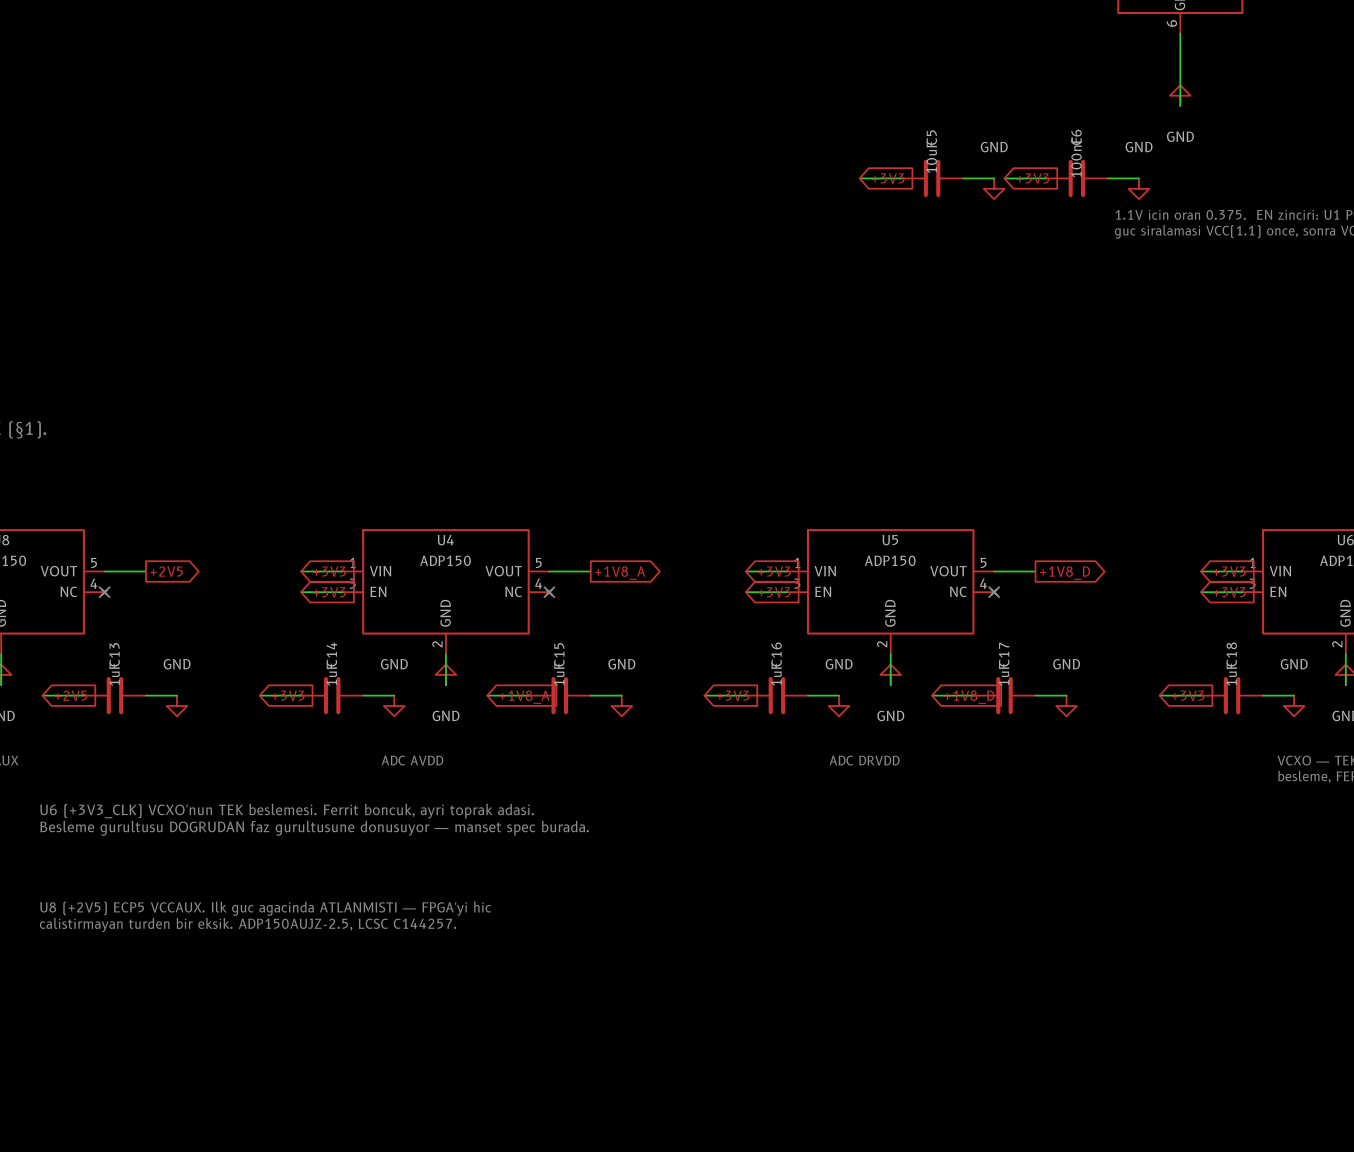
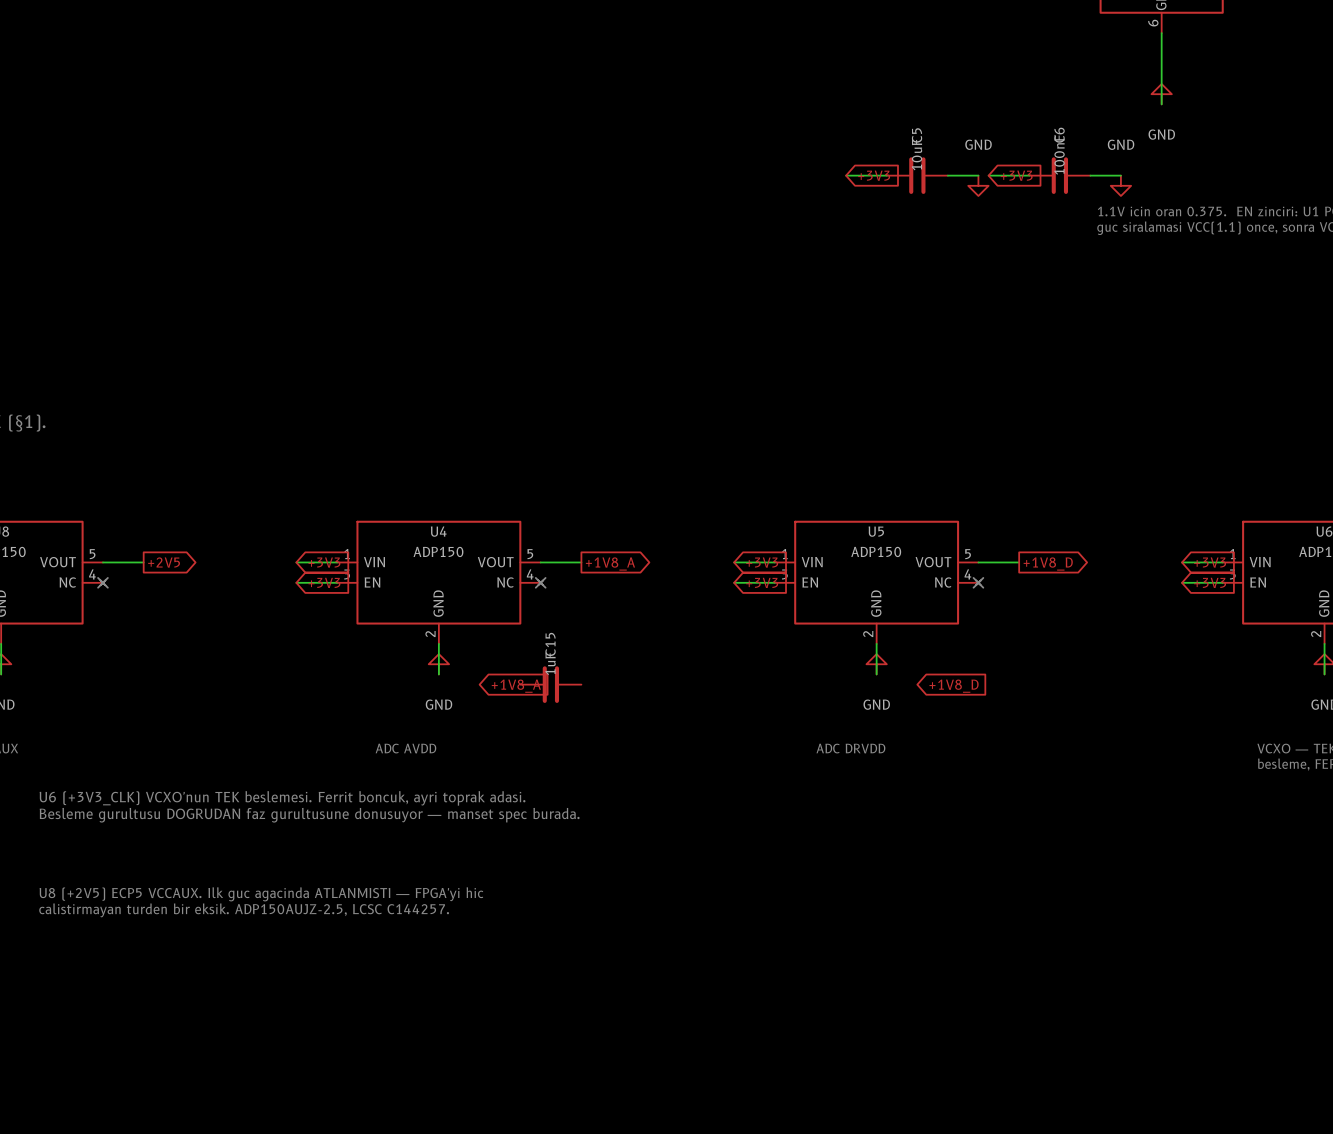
wire: (42, 695) (83, 695) -> none
global label: +2V5 (71, 695) -> none
C13: 1uF (114, 695) -> none
wire: (145, 695) (177, 695) -> none
wire: (259, 695) (301, 695) -> none
global label: +3V3 (288, 695) -> none
C14: 1uF (332, 695) -> none
wire: (363, 695) (394, 695) -> none
wire: (487, 695) (528, 695) -> none
wire: (590, 695) (621, 695) -> none
wire: (704, 695) (745, 695) -> none
global label: +3V3 (733, 695) -> none
C16: 1uF (776, 695) -> none
wire: (807, 695) (838, 695) -> none
wire: (932, 695) (973, 695) -> none
C17: 1uF (1004, 695) -> none
wire: (1035, 695) (1066, 695) -> none
wire: (1159, 695) (1201, 695) -> none
global label: +3V3 (1188, 695) -> none
C18: 1uF (1232, 695) -> none
wire: (1263, 695) (1294, 695) -> none
power symbol: GND (177, 705) -> none
power symbol: GND (394, 705) -> none
power symbol: GND (621, 705) -> none
power symbol: GND (838, 705) -> none
power symbol: GND (1066, 705) -> none
power symbol: GND (1294, 705) -> none

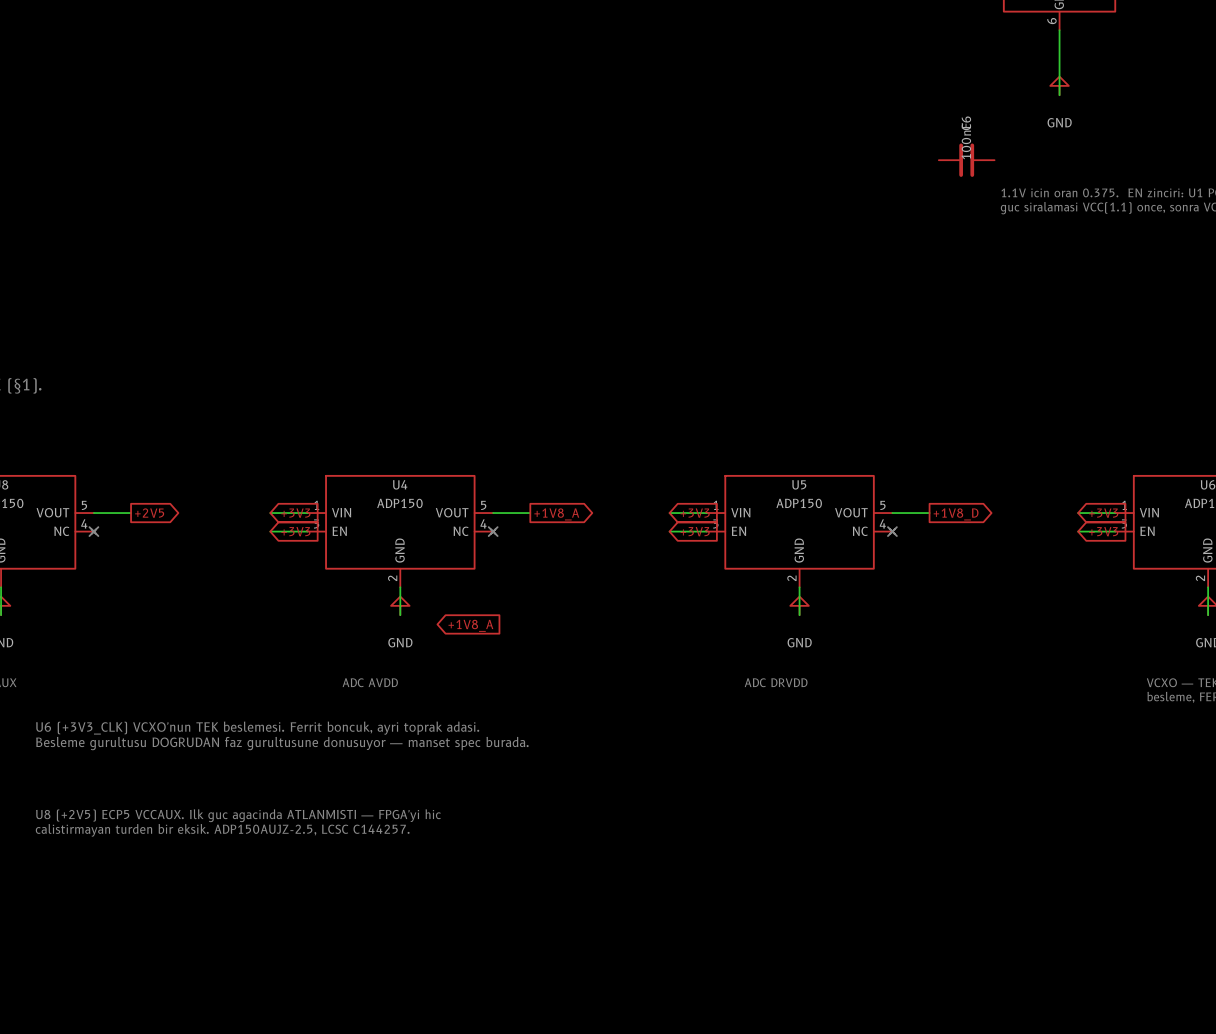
wire: (846, 175) (886, 175) -> none
global label: +3V3 (874, 175) -> none
C5: 10uF (917, 175) -> none
wire: (947, 175) (978, 175) -> none
wire: (988, 175) (1029, 175) -> none
global label: +3V3 (1016, 175) -> none
wire: (1090, 175) (1120, 175) -> none
power symbol: GND (978, 185) -> none
power symbol: GND (1120, 185) -> none
C15: 1uF (550, 684) -> none
global label: +1V8_D (954, 686) -> none

